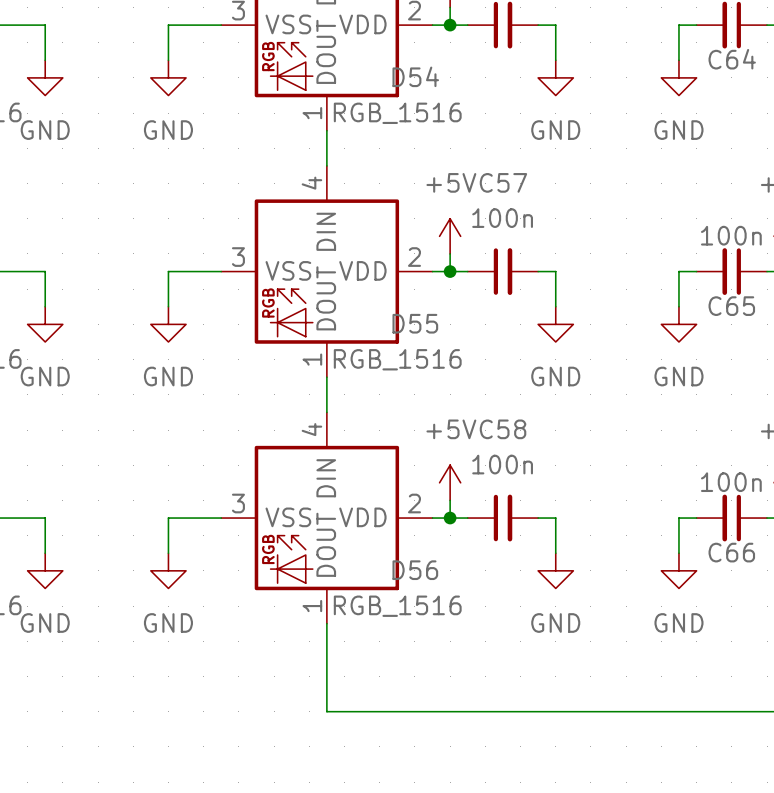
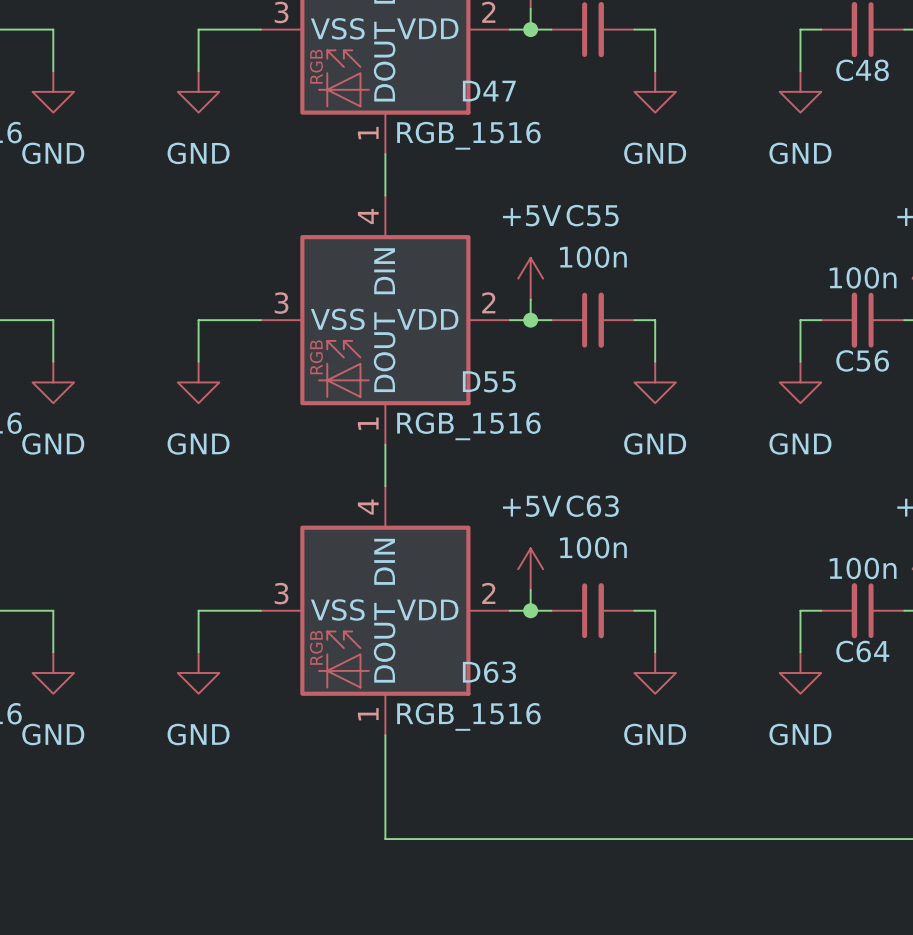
C64 name: C64 (732, 59) -> C48 (862, 70)
D54 name: D54 (415, 76) -> D47 (489, 91)
C57 name: C57 (503, 182) -> C55 (592, 215)
C65 name: C65 (731, 306) -> C56 (862, 360)
C58 name: C58 (503, 429) -> C63 (592, 506)
C66 name: C66 (731, 552) -> C64 (862, 651)
D56 name: D56 (415, 570) -> D63 (489, 672)

